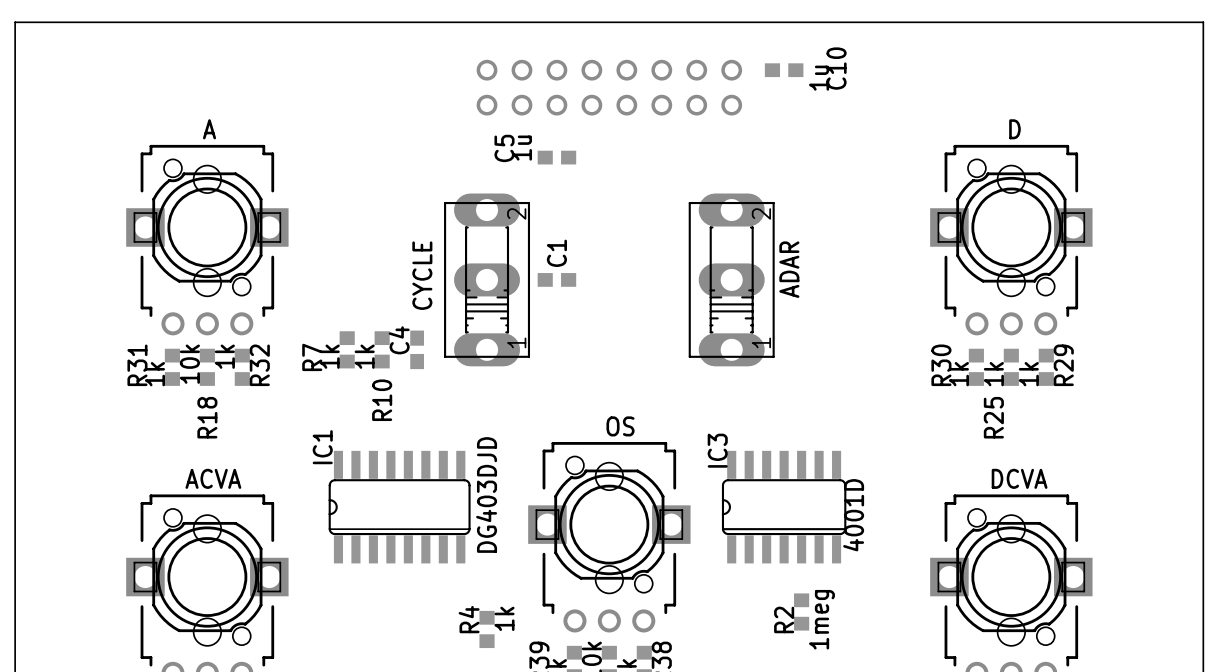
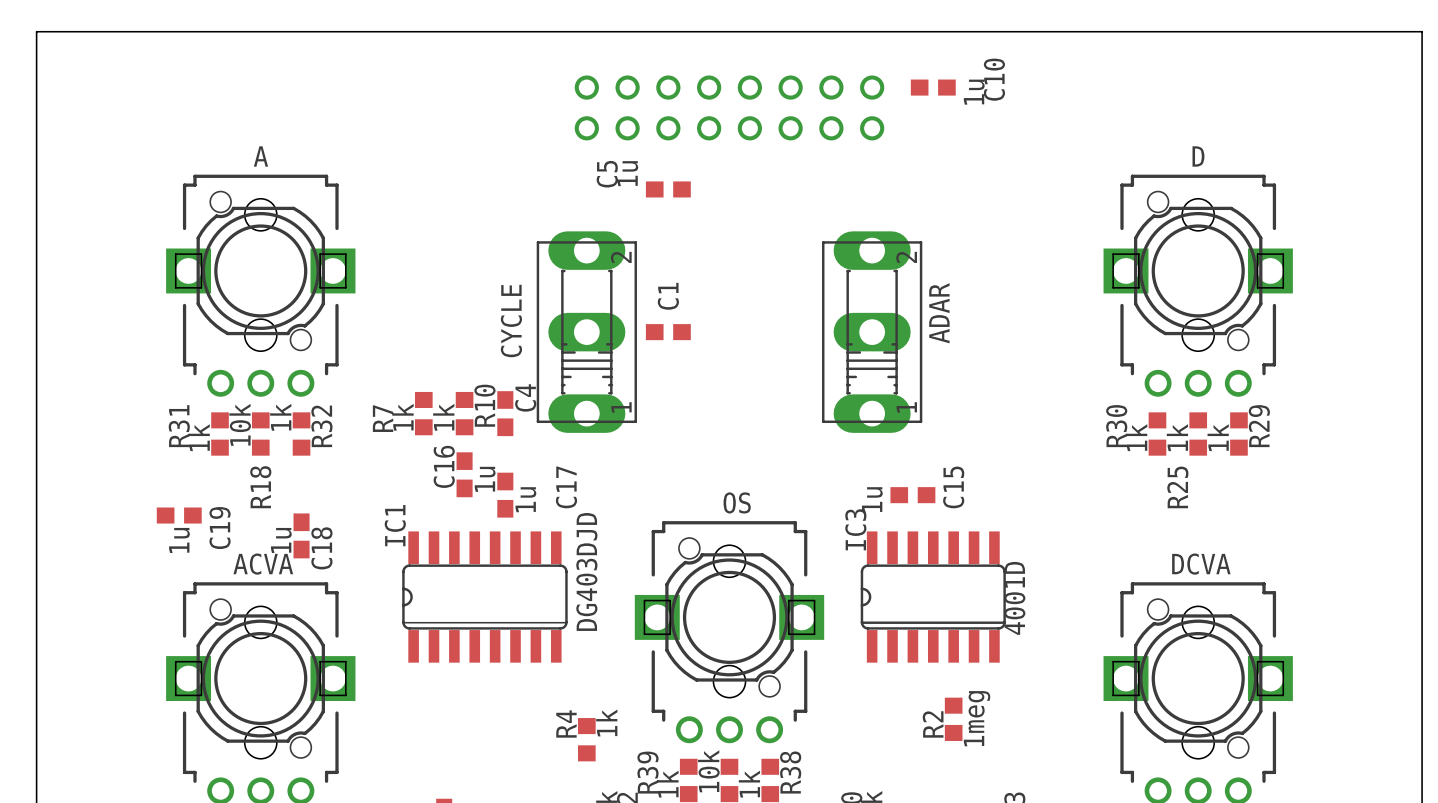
C4 name position: C4 (399, 340) -> C4 (525, 397)
R10 name position: R10 (382, 400) -> R10 (484, 405)
C16: none -> 1u (464, 474)
C17: none -> 1u (505, 495)
C15: none -> 1u (912, 495)
C19: none -> 1u (179, 515)
C18: none -> 1u (301, 535)

